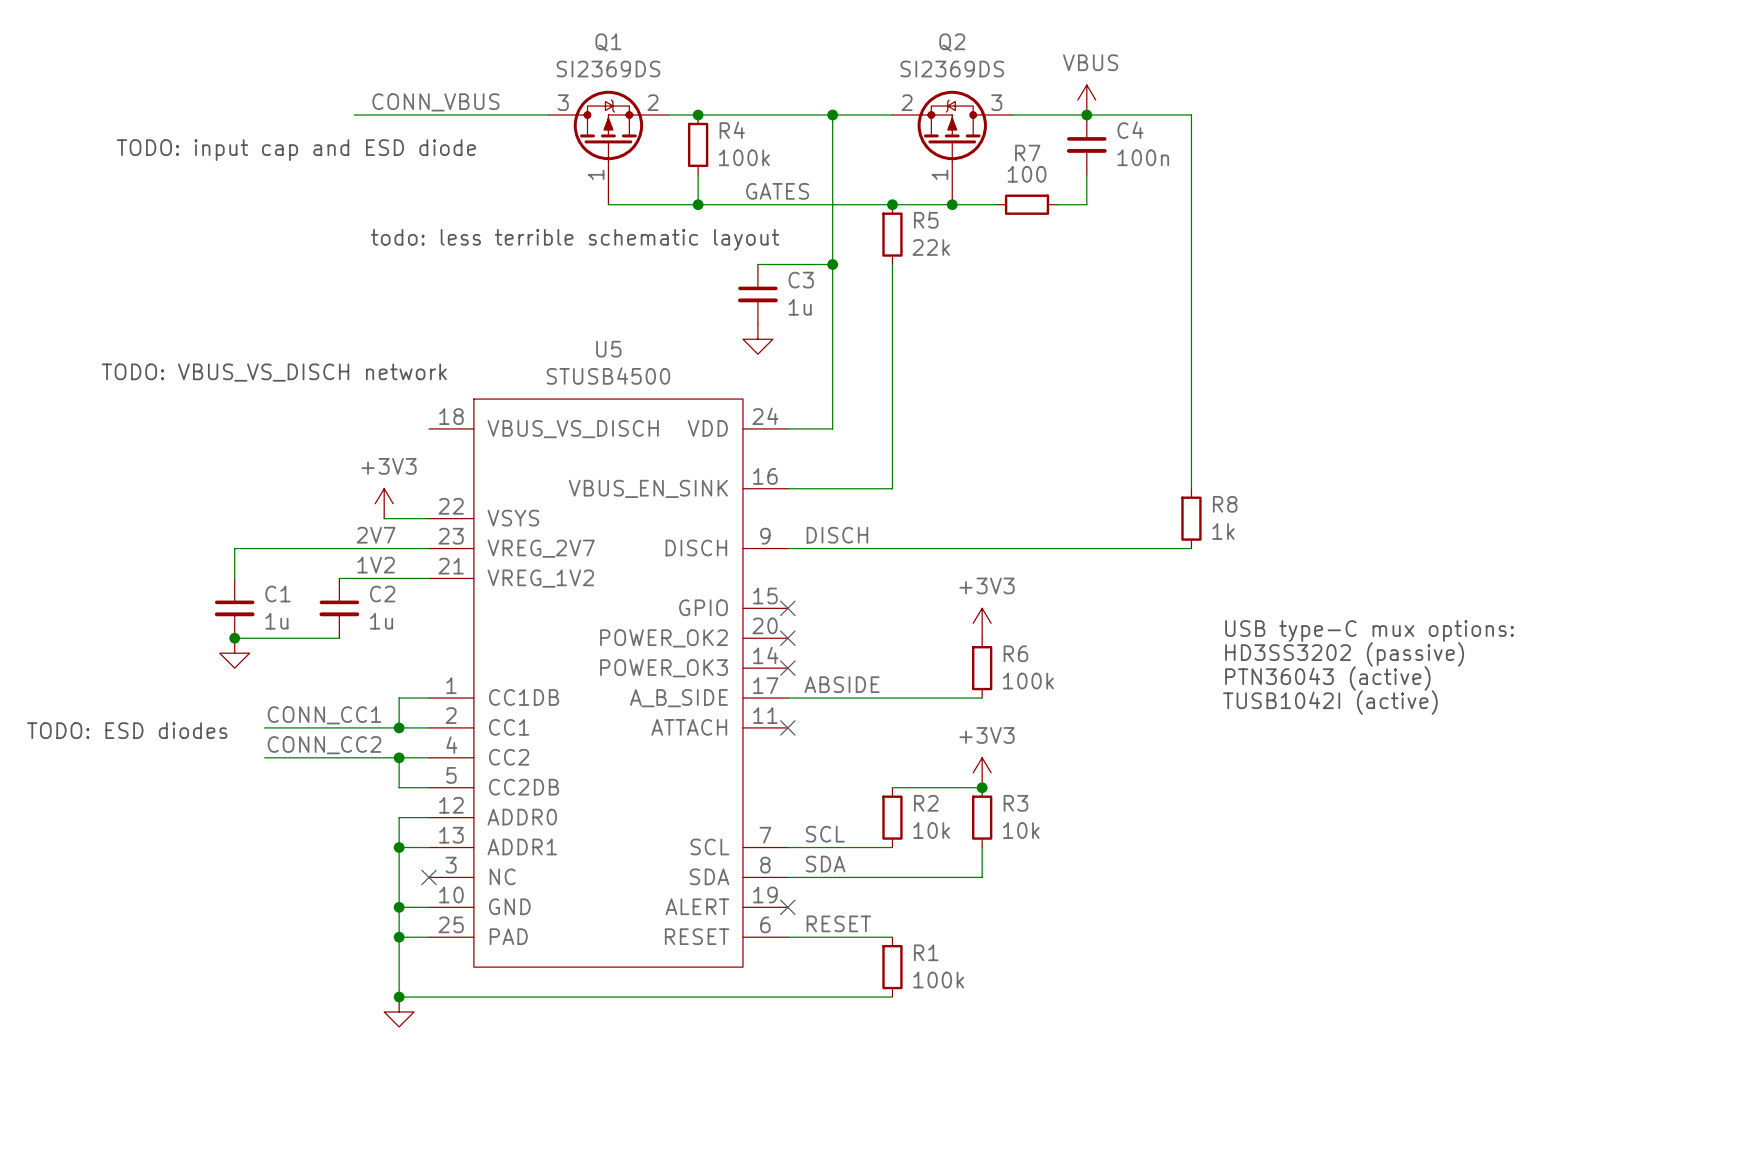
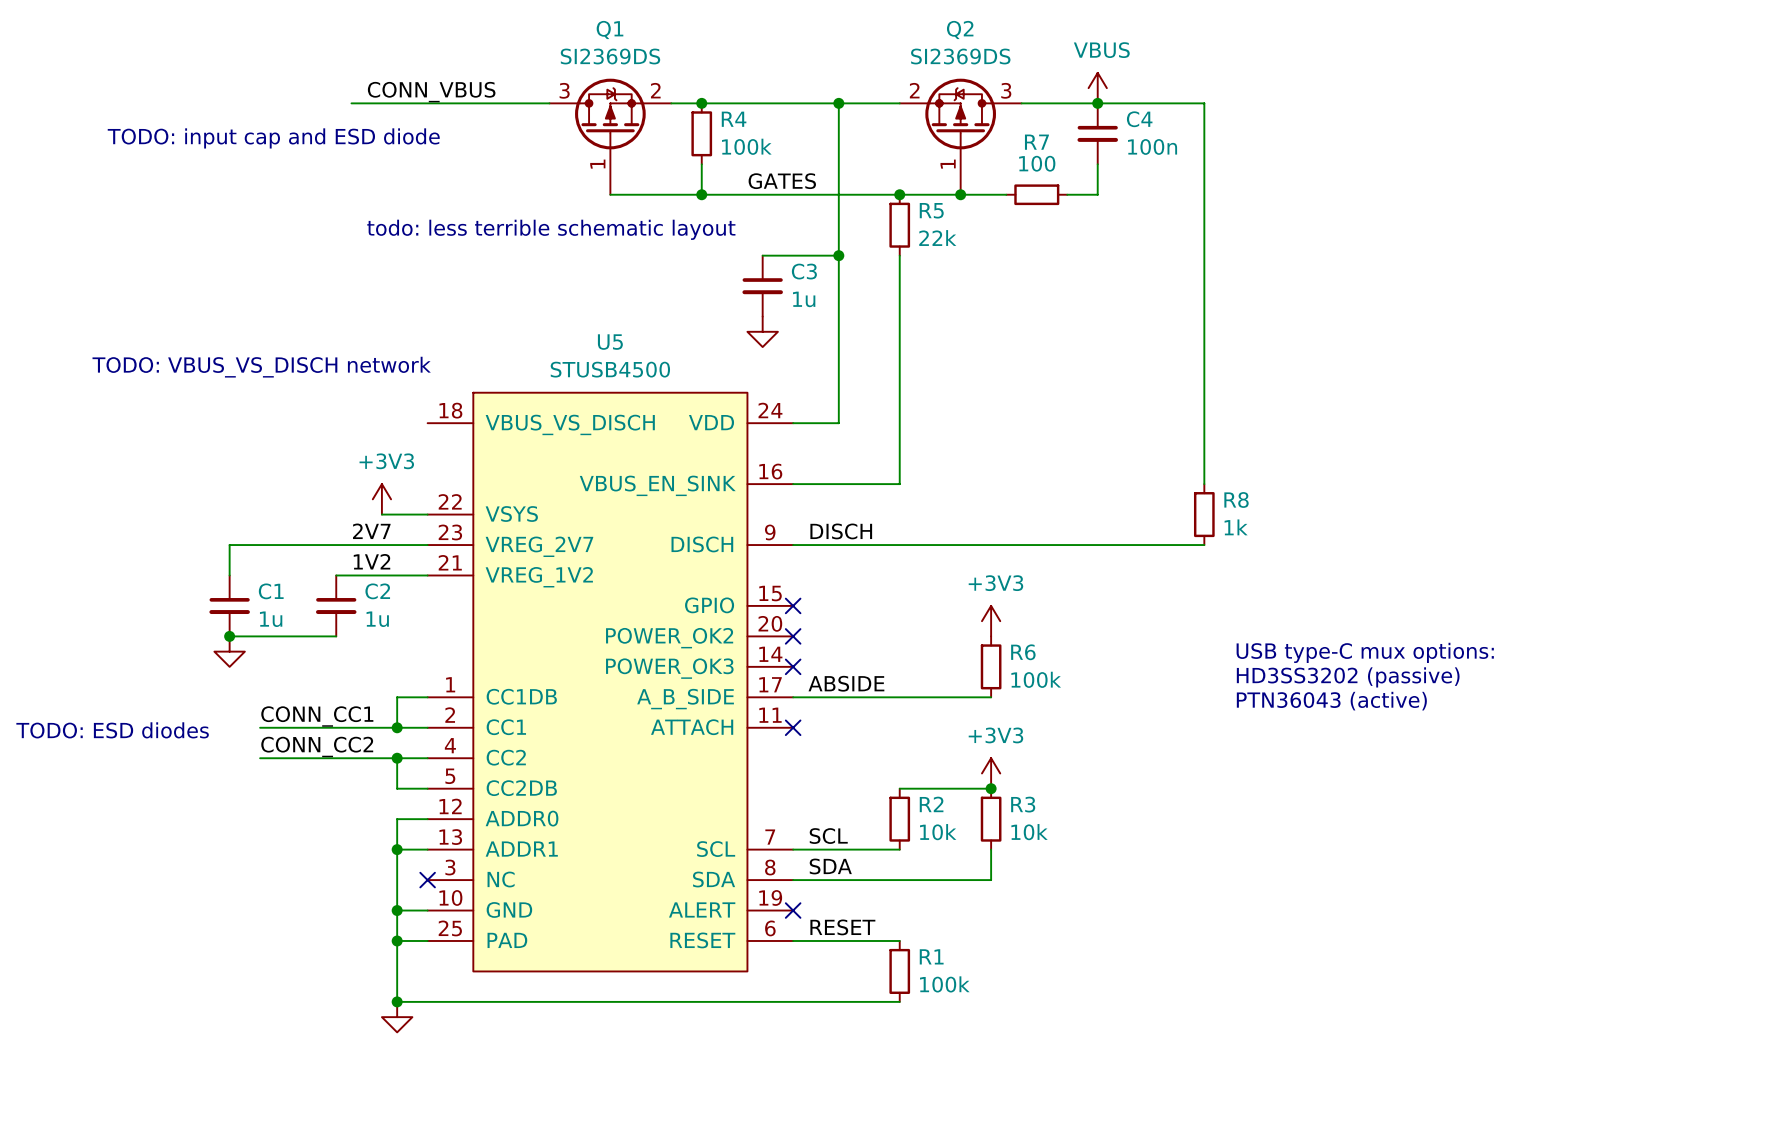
text: USB type-C mux options: (1369, 631) -> none
text: HD3SS3202 (passive) (1344, 654) -> USB type-C mux options: (1365, 652)
text: PTN36043 (active) (1327, 678) -> HD3SS3202 (passive) (1348, 677)
text: TUSB1042I (active) (1330, 702) -> PTN36043 (active) (1331, 701)

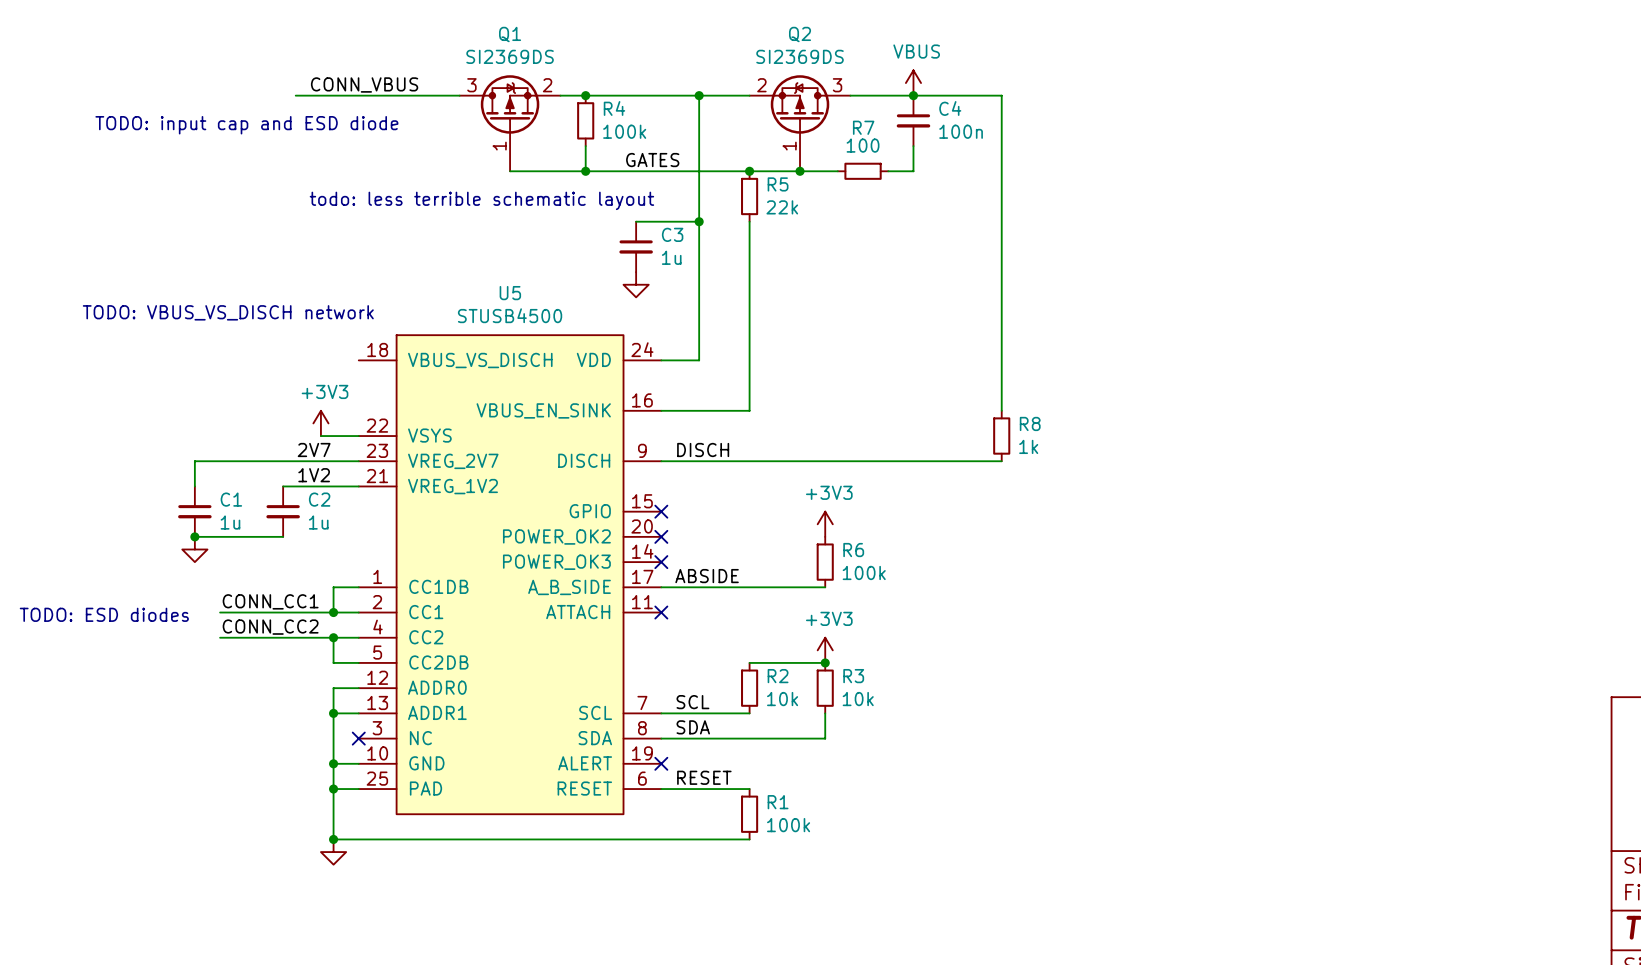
text: USB type-C mux options: (1365, 652) -> none
text: HD3SS3202 (passive) (1348, 677) -> none
text: PTN36043 (active) (1331, 701) -> none

